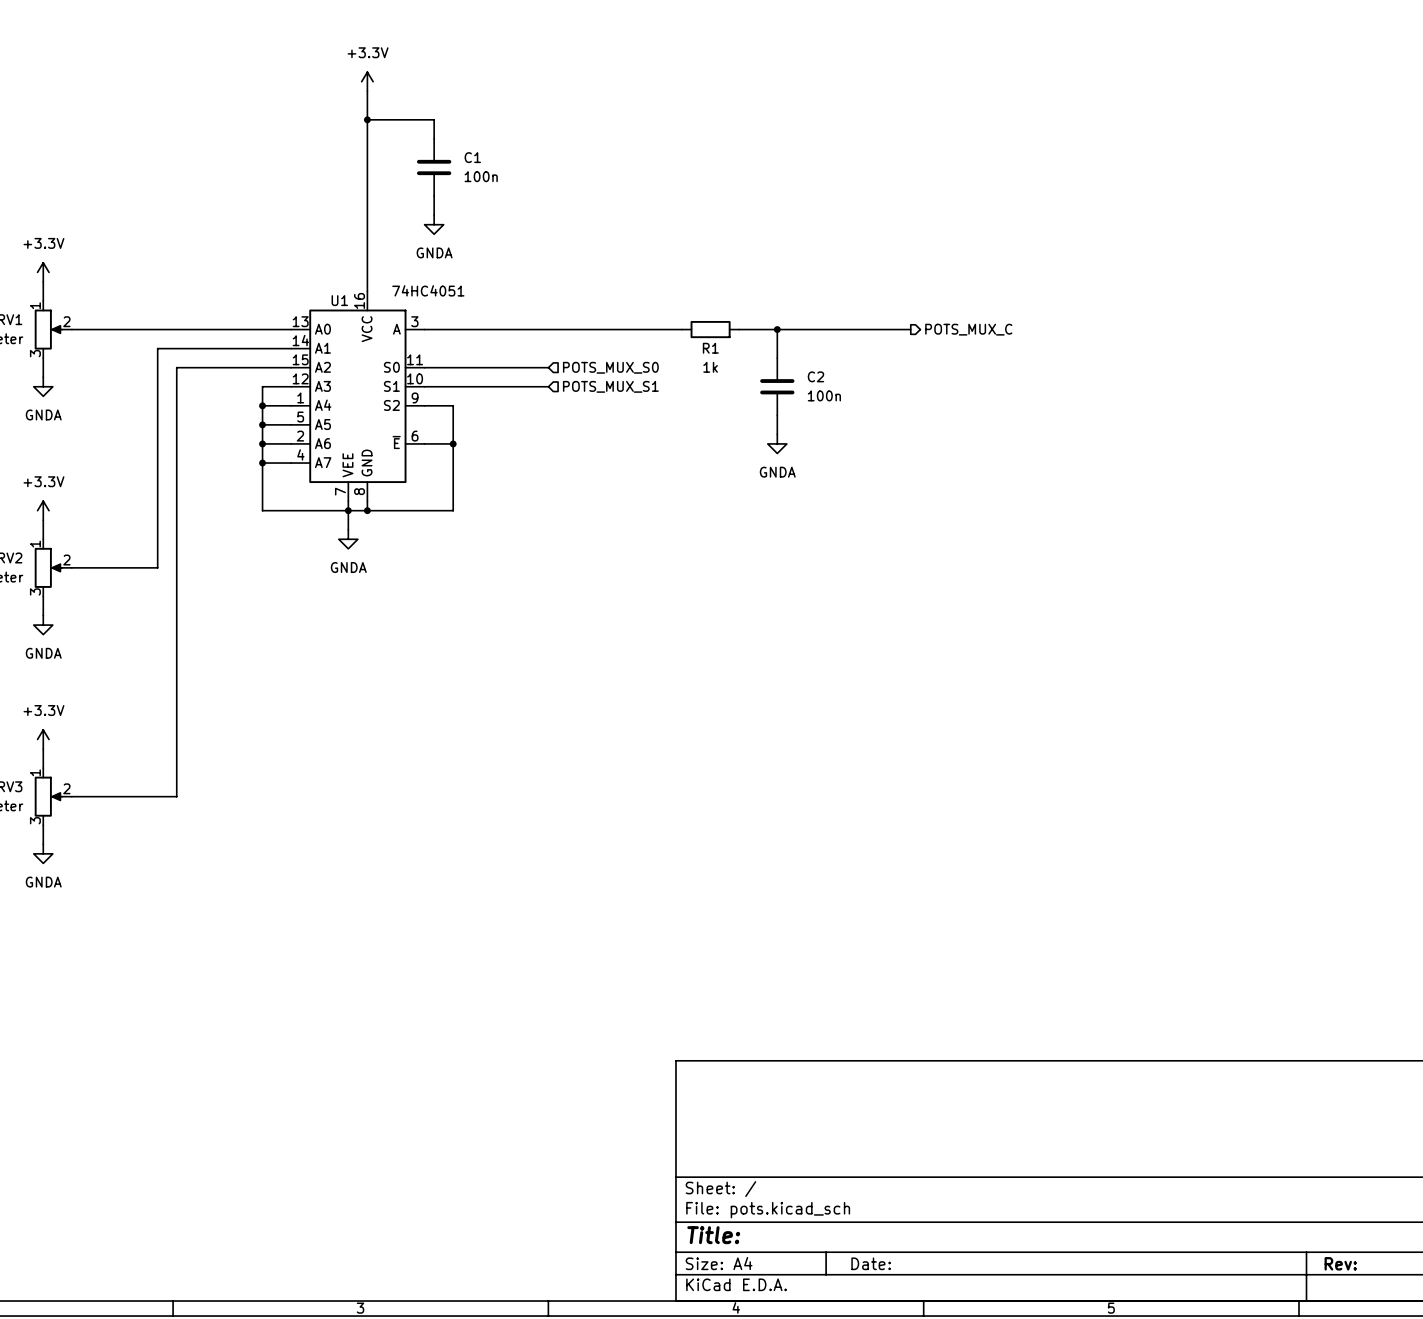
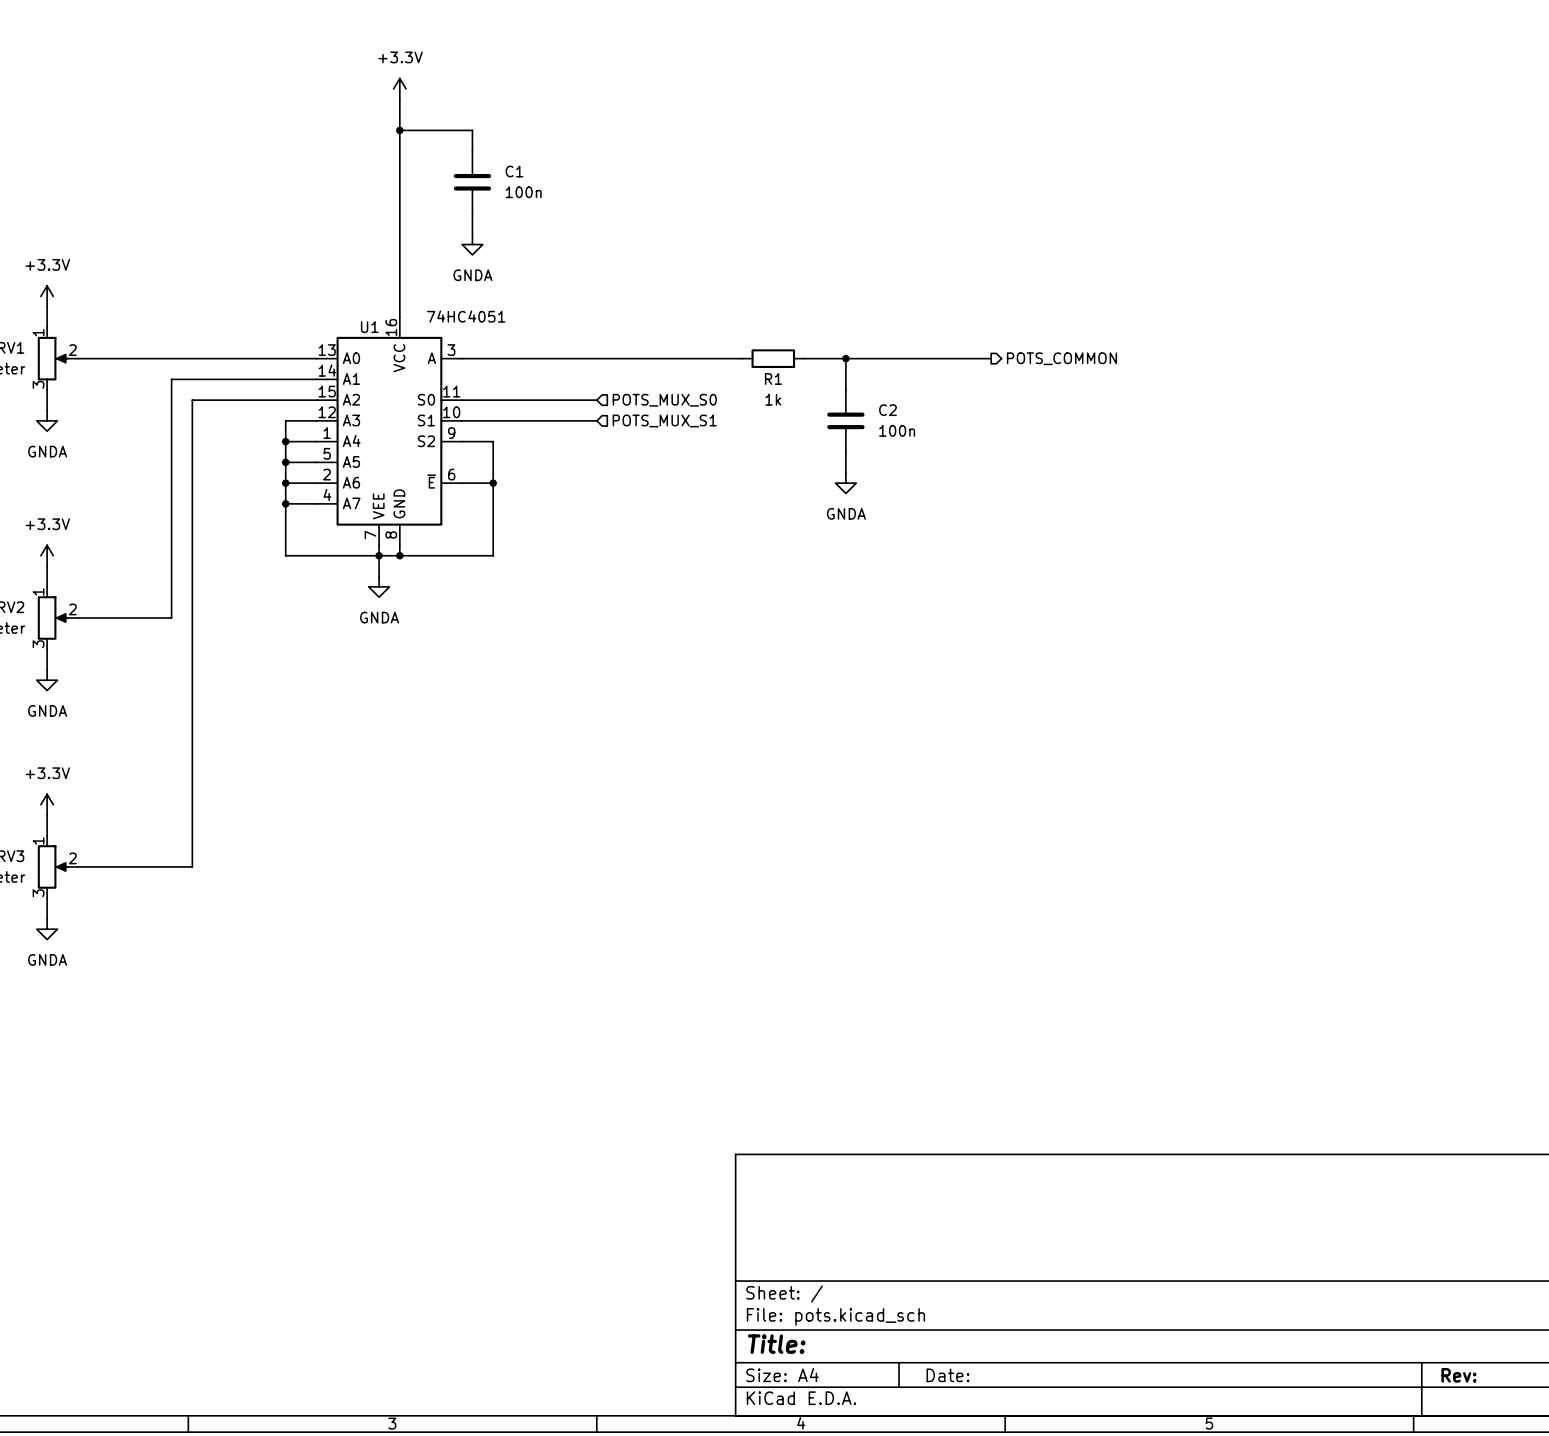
hierarchical label: POTS_MUX_C (968, 329) -> POTS_COMMON (1061, 358)

